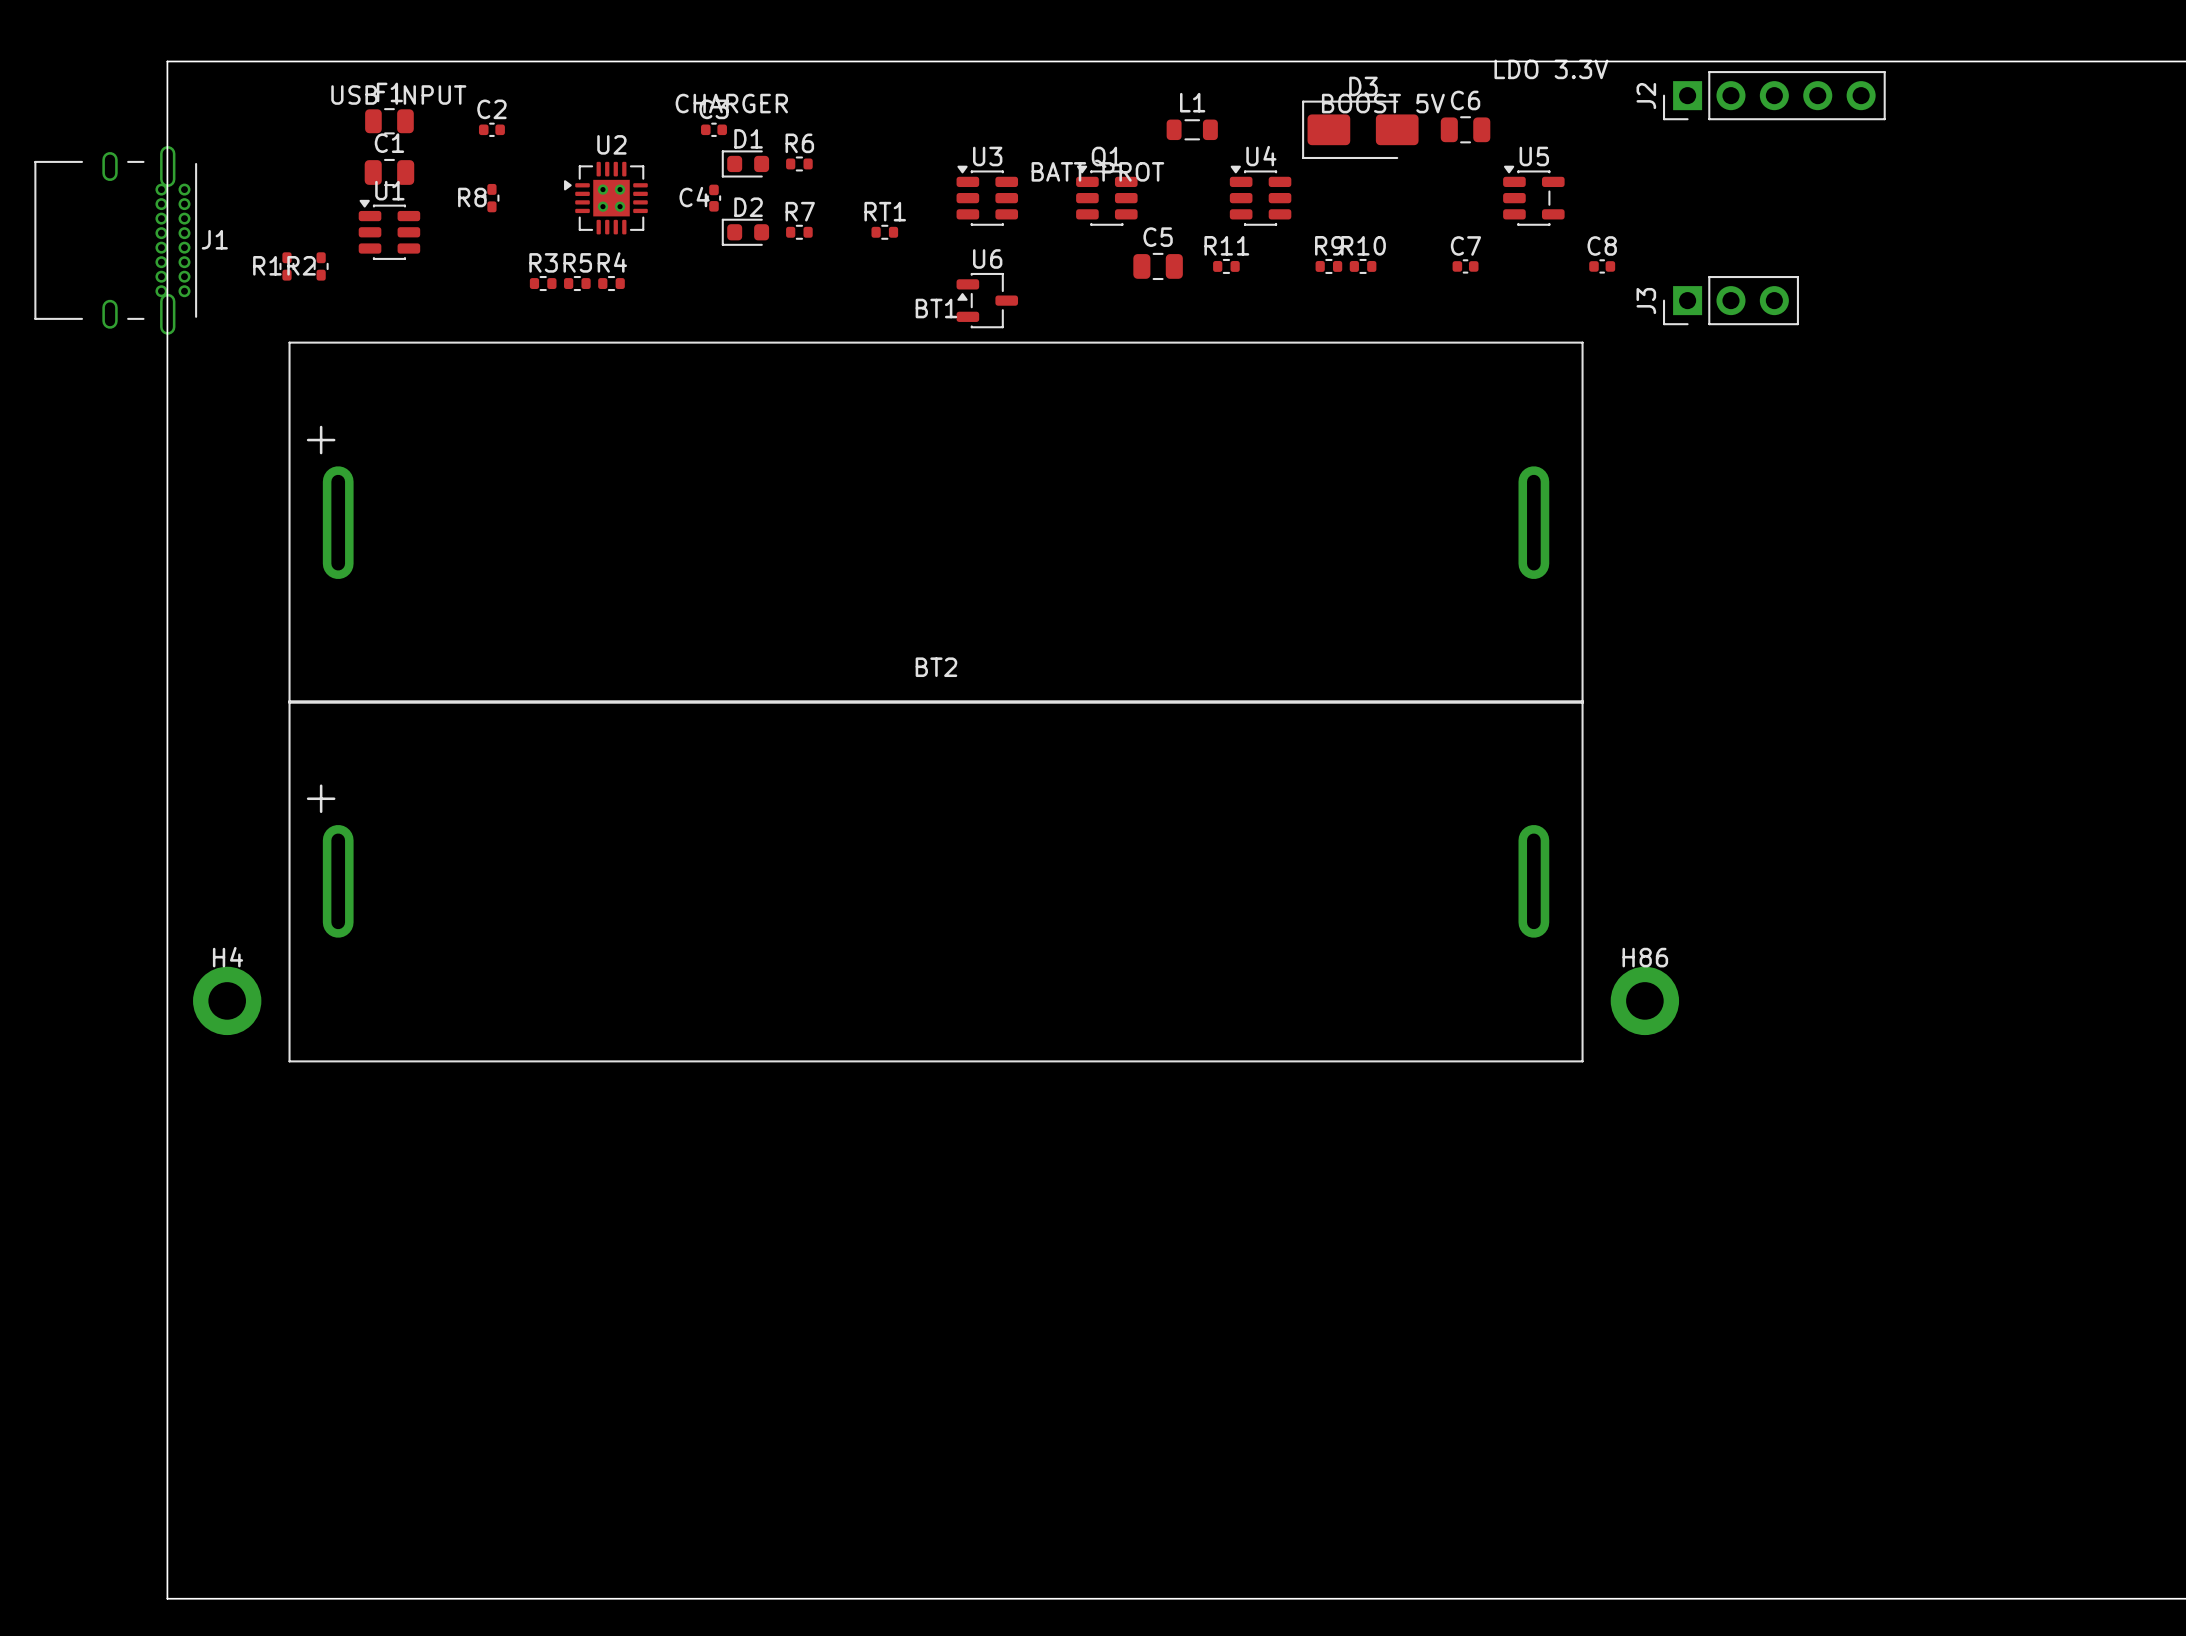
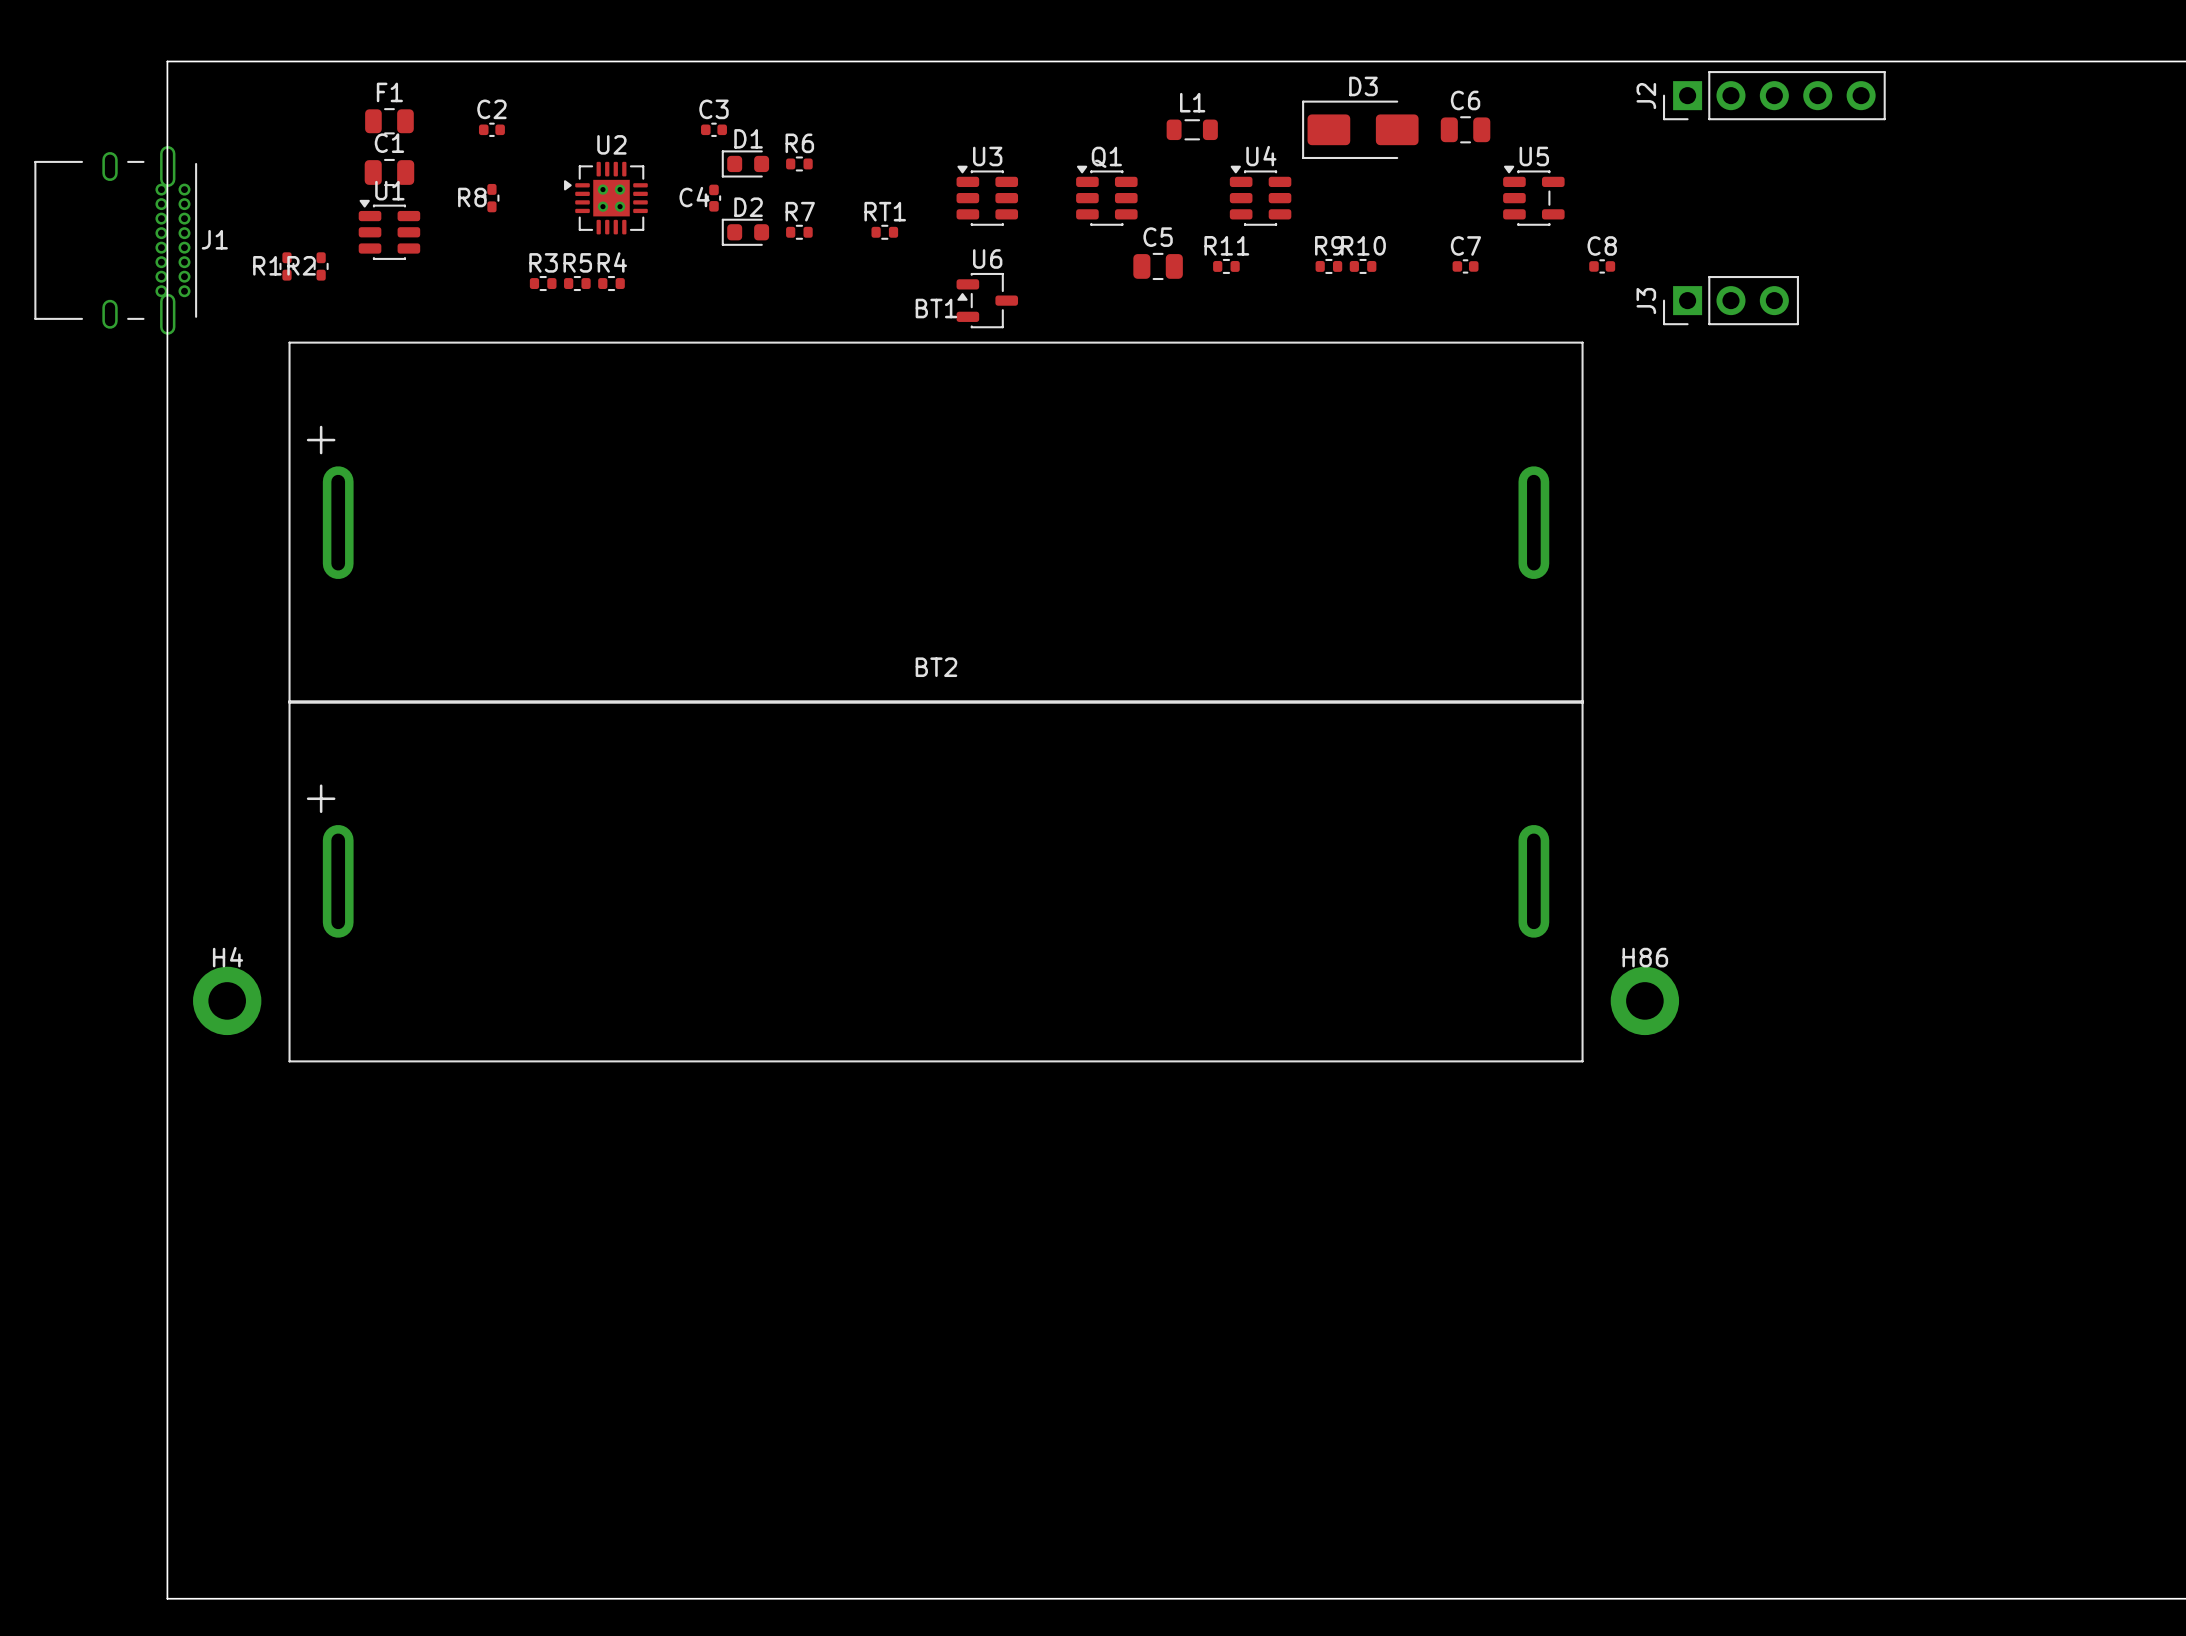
text: LDO 3.3V (1551, 69) -> none
text: USB INPUT (398, 95) -> none
text: CHARGER (731, 103) -> none
text: BOOST 5V (1383, 103) -> none
text: BATT PROT (1097, 171) -> none

